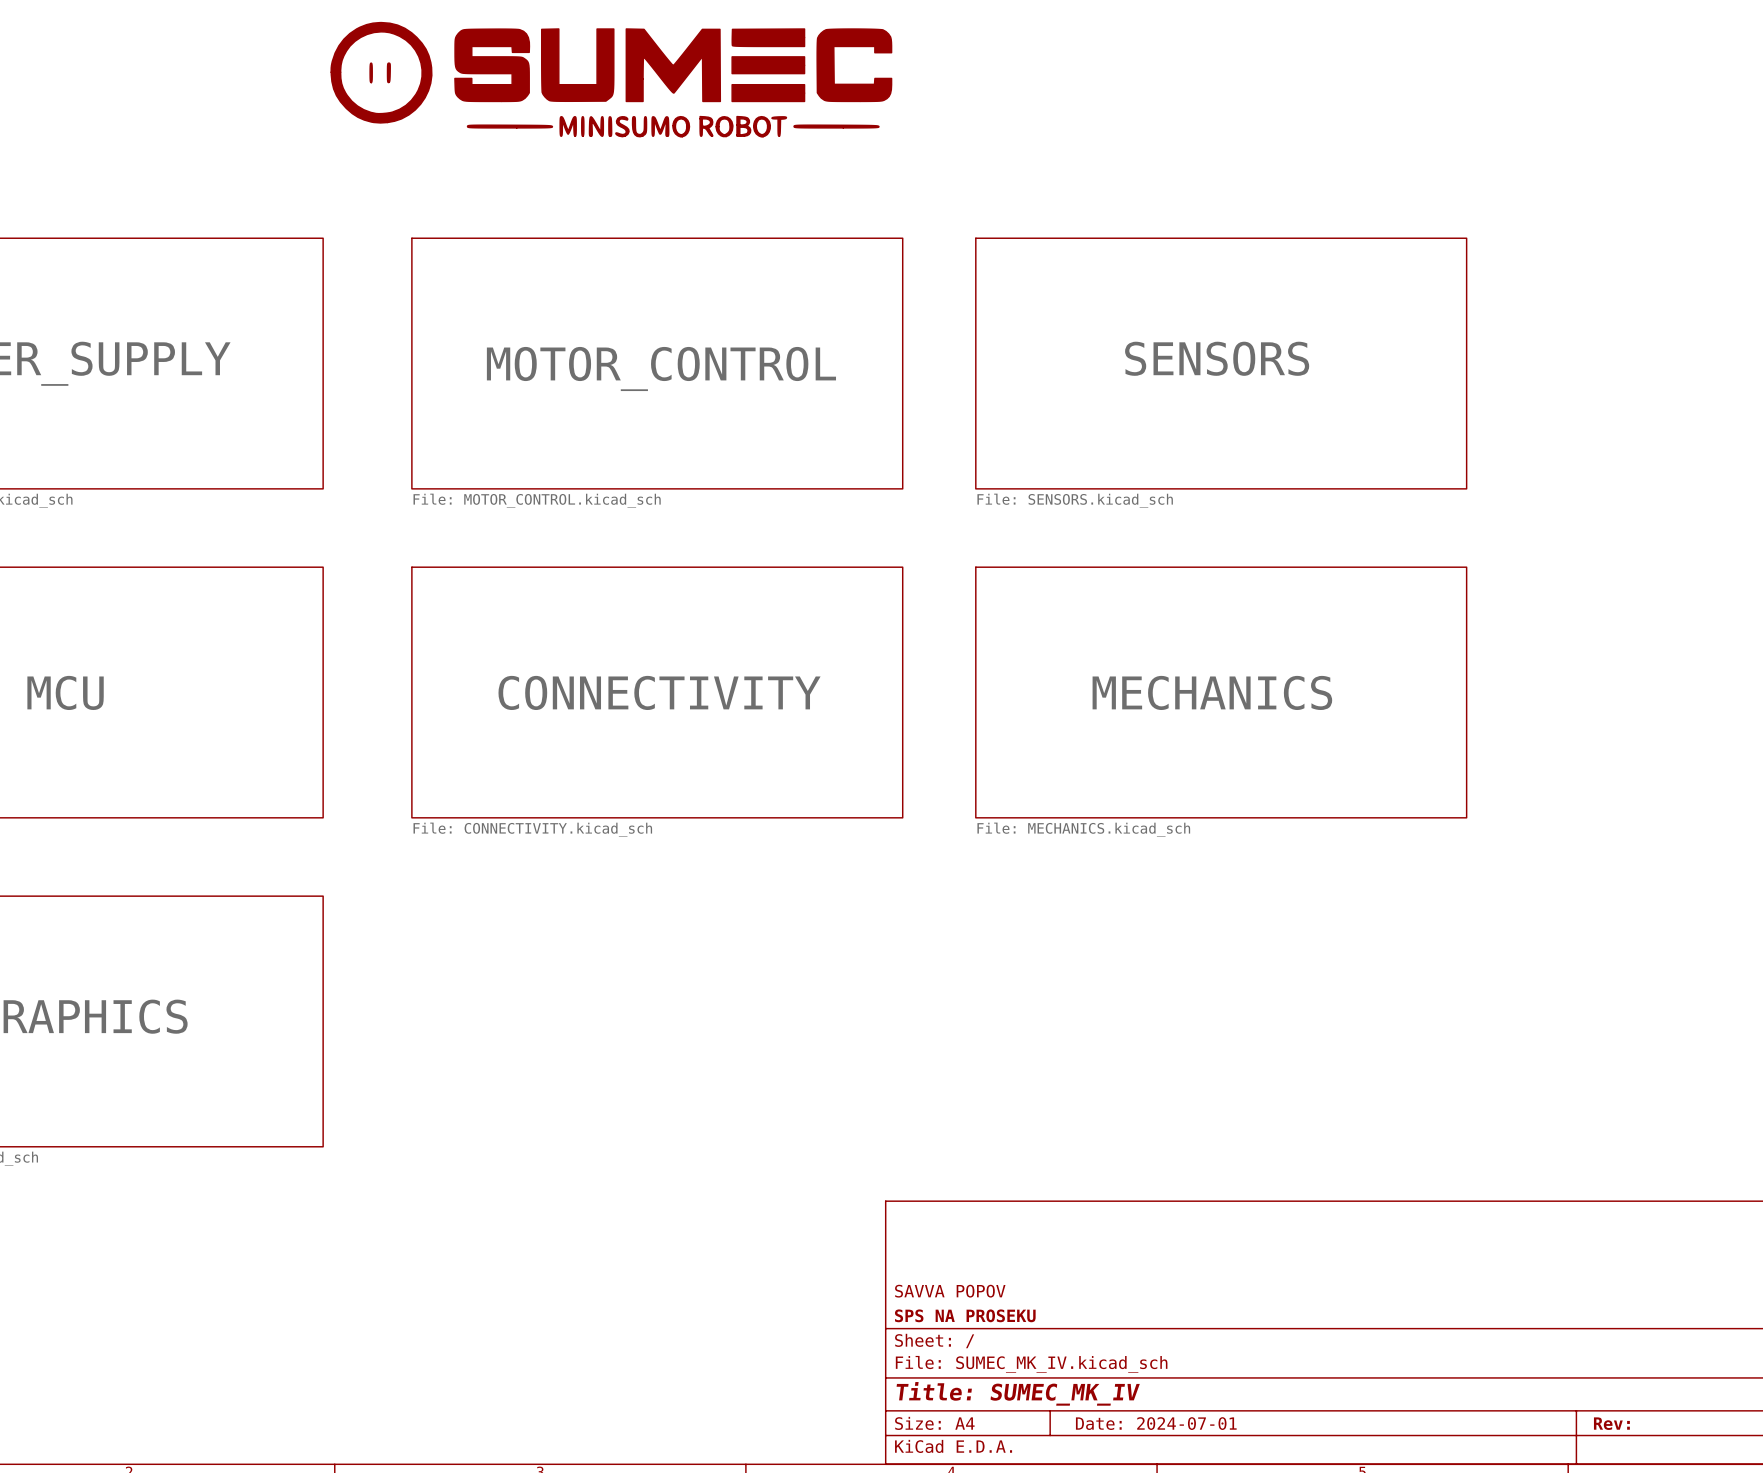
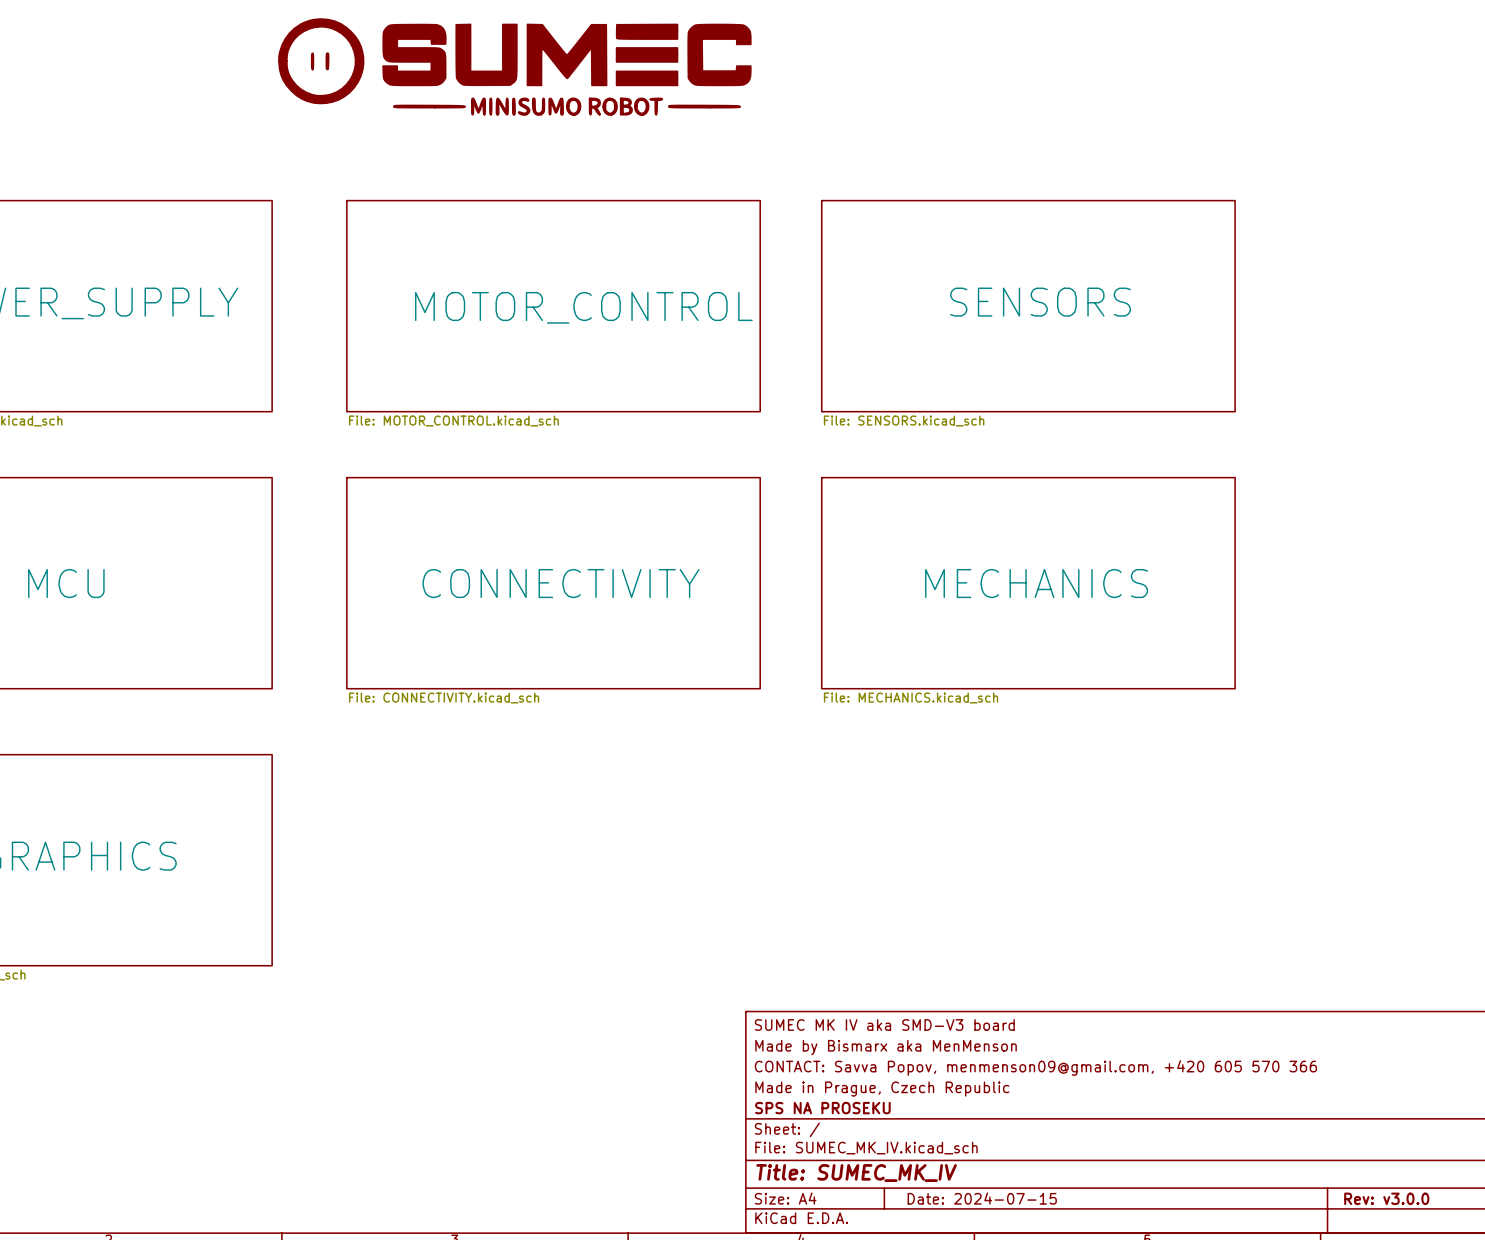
title block: none -> SUMEC MK IV aka SMD-V3 board (884, 1025)
title block: none -> Made by Bismarx aka MenMenson (886, 1047)
title block: none -> CONTACT: Savva Popov, menmenson09@gmail.com, +420 605 570 366 (1035, 1068)
title block: SAVVA POPOV (950, 1291) -> Made in Prague, Czech Republic (882, 1089)
title block: Date: 2024-07-01 (1156, 1423) -> Date: 2024-07-15 (982, 1198)
title block: Rev: (1611, 1423) -> Rev: v3.0.0 (1386, 1198)

